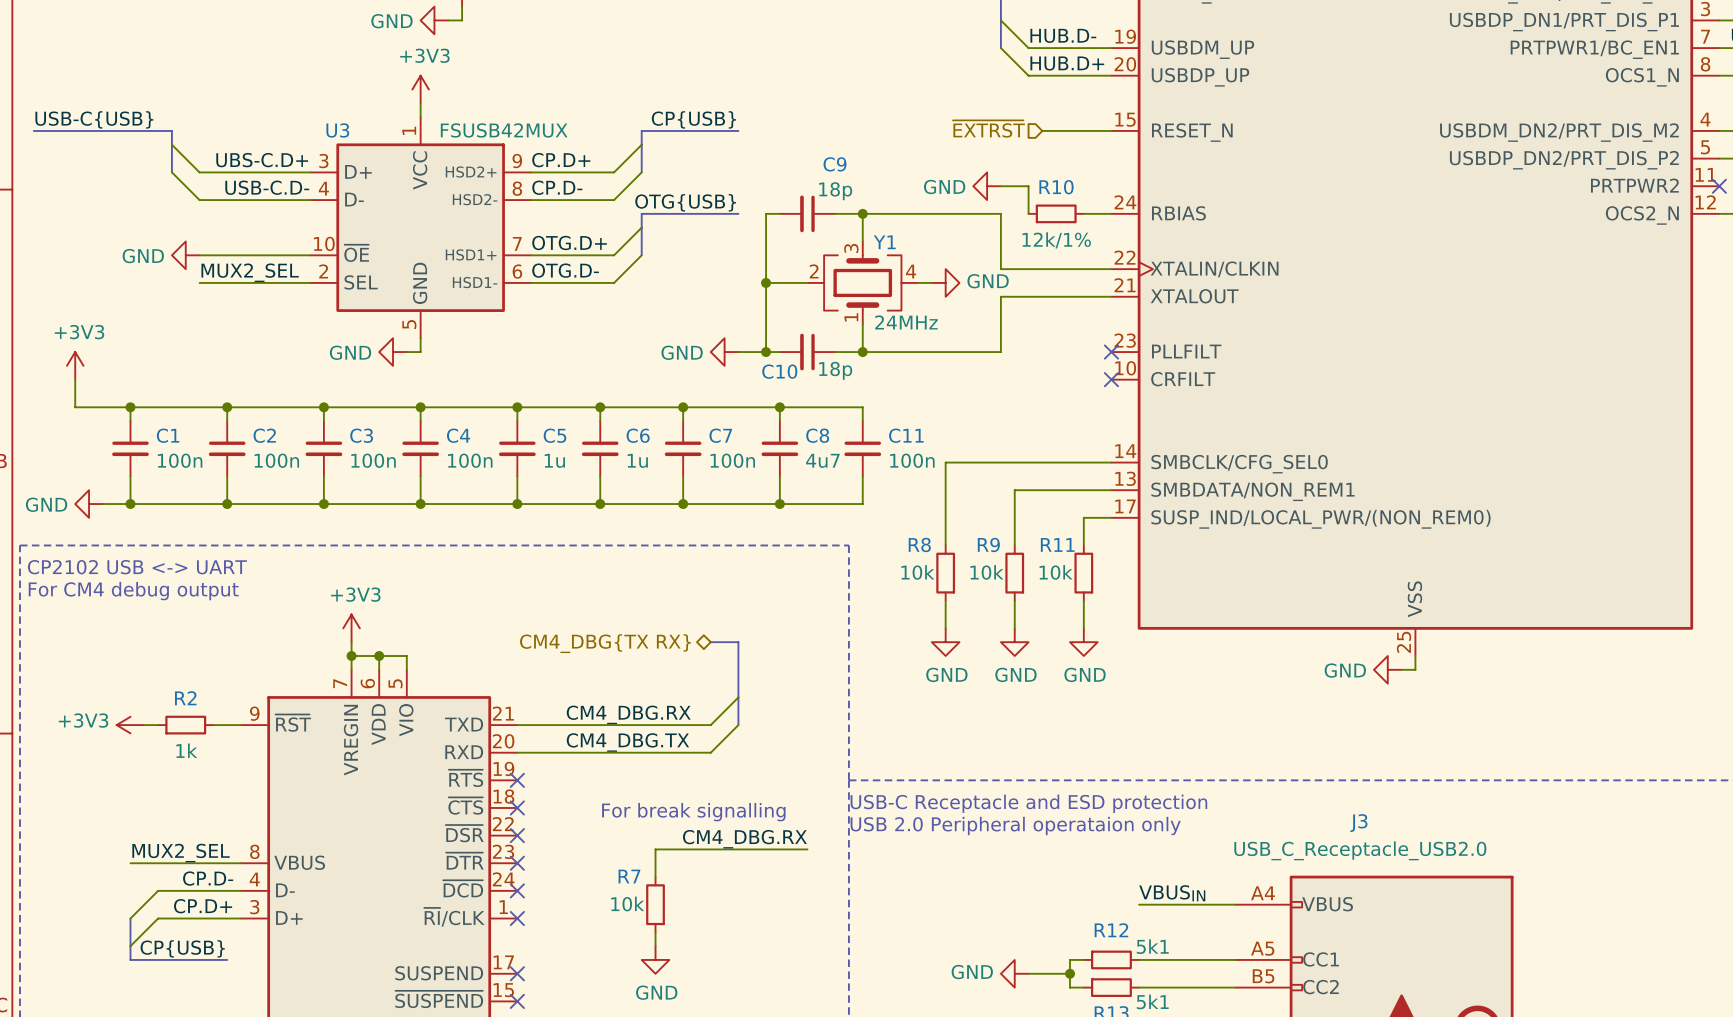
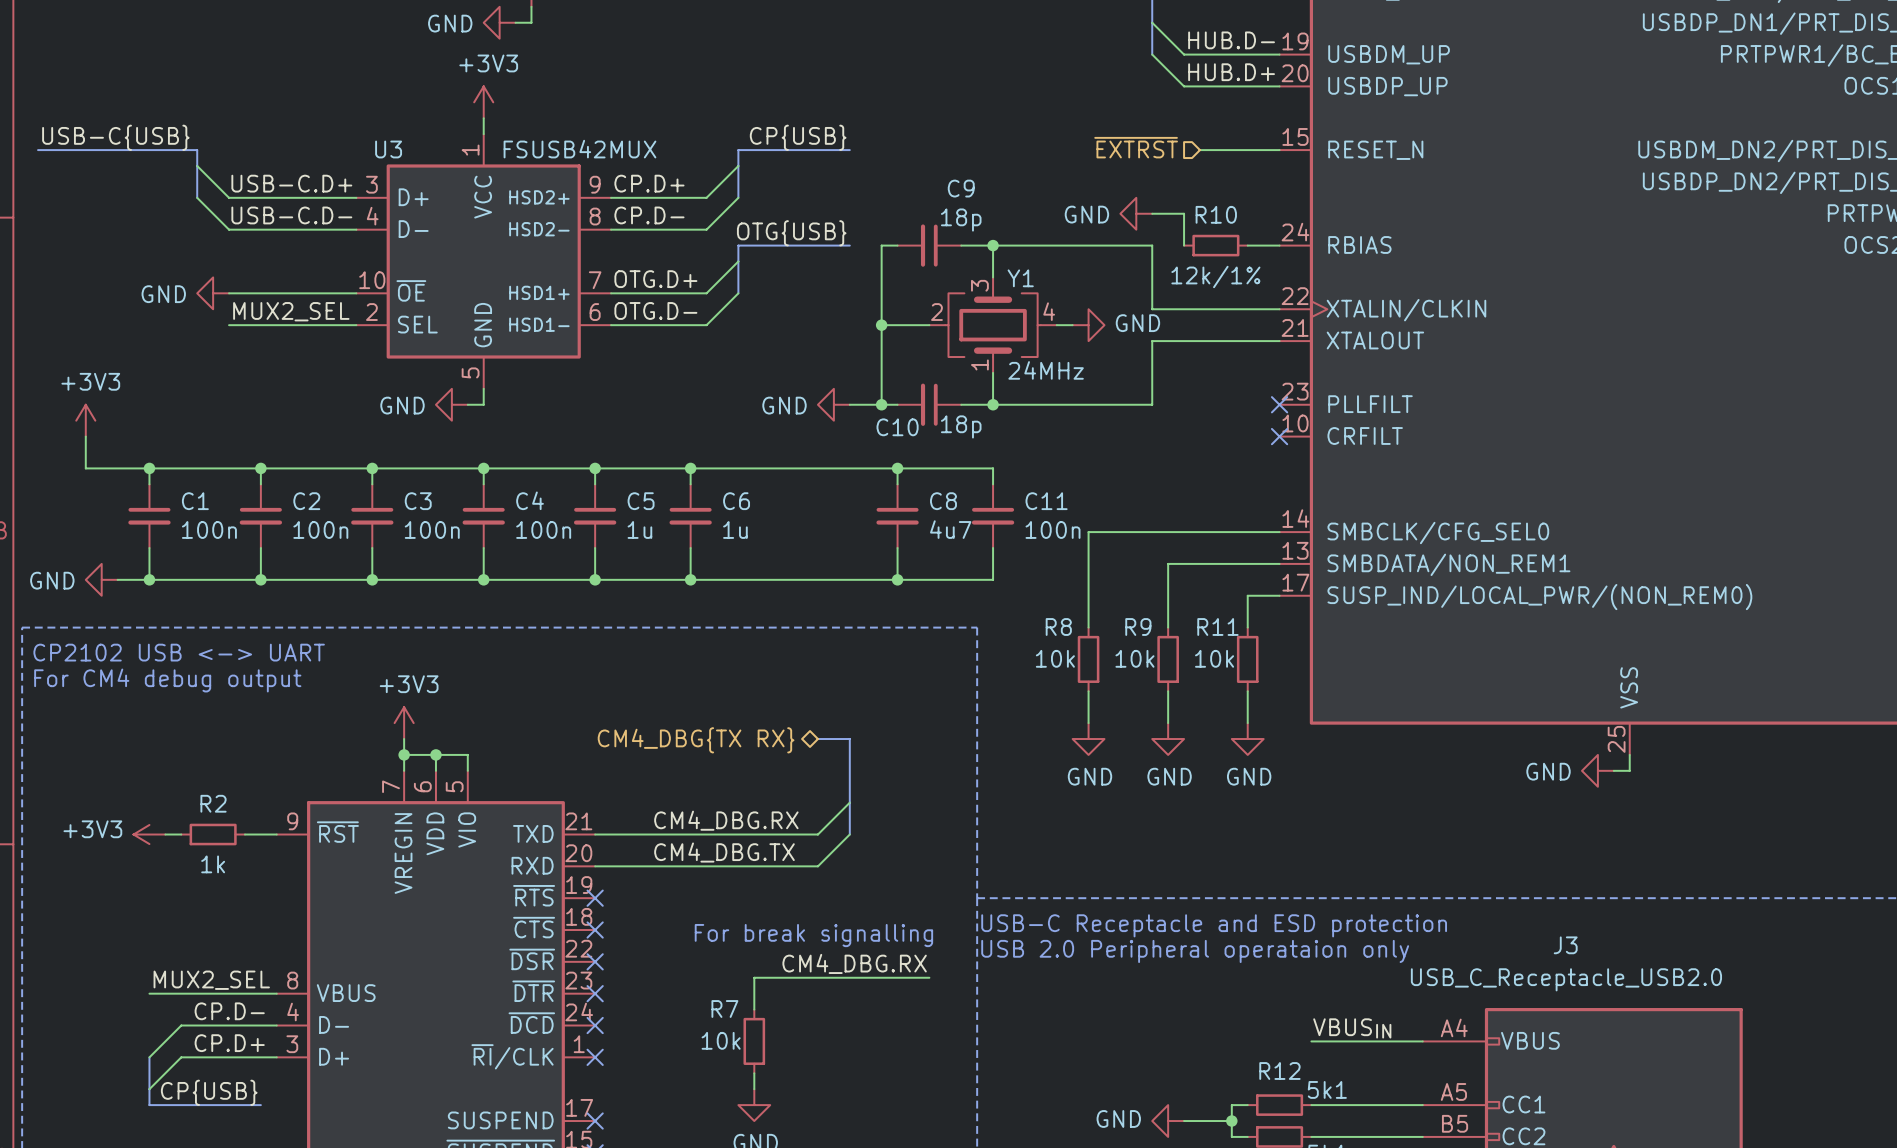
label: UBS-C.D+ (262, 160) -> USB-C.D+ (291, 183)
wire: (683, 407) (683, 421) -> none
junction: (683, 407) -> none
C7: 100n (683, 448) -> none
wire: (683, 476) (683, 504) -> none
junction: (683, 504) -> none

